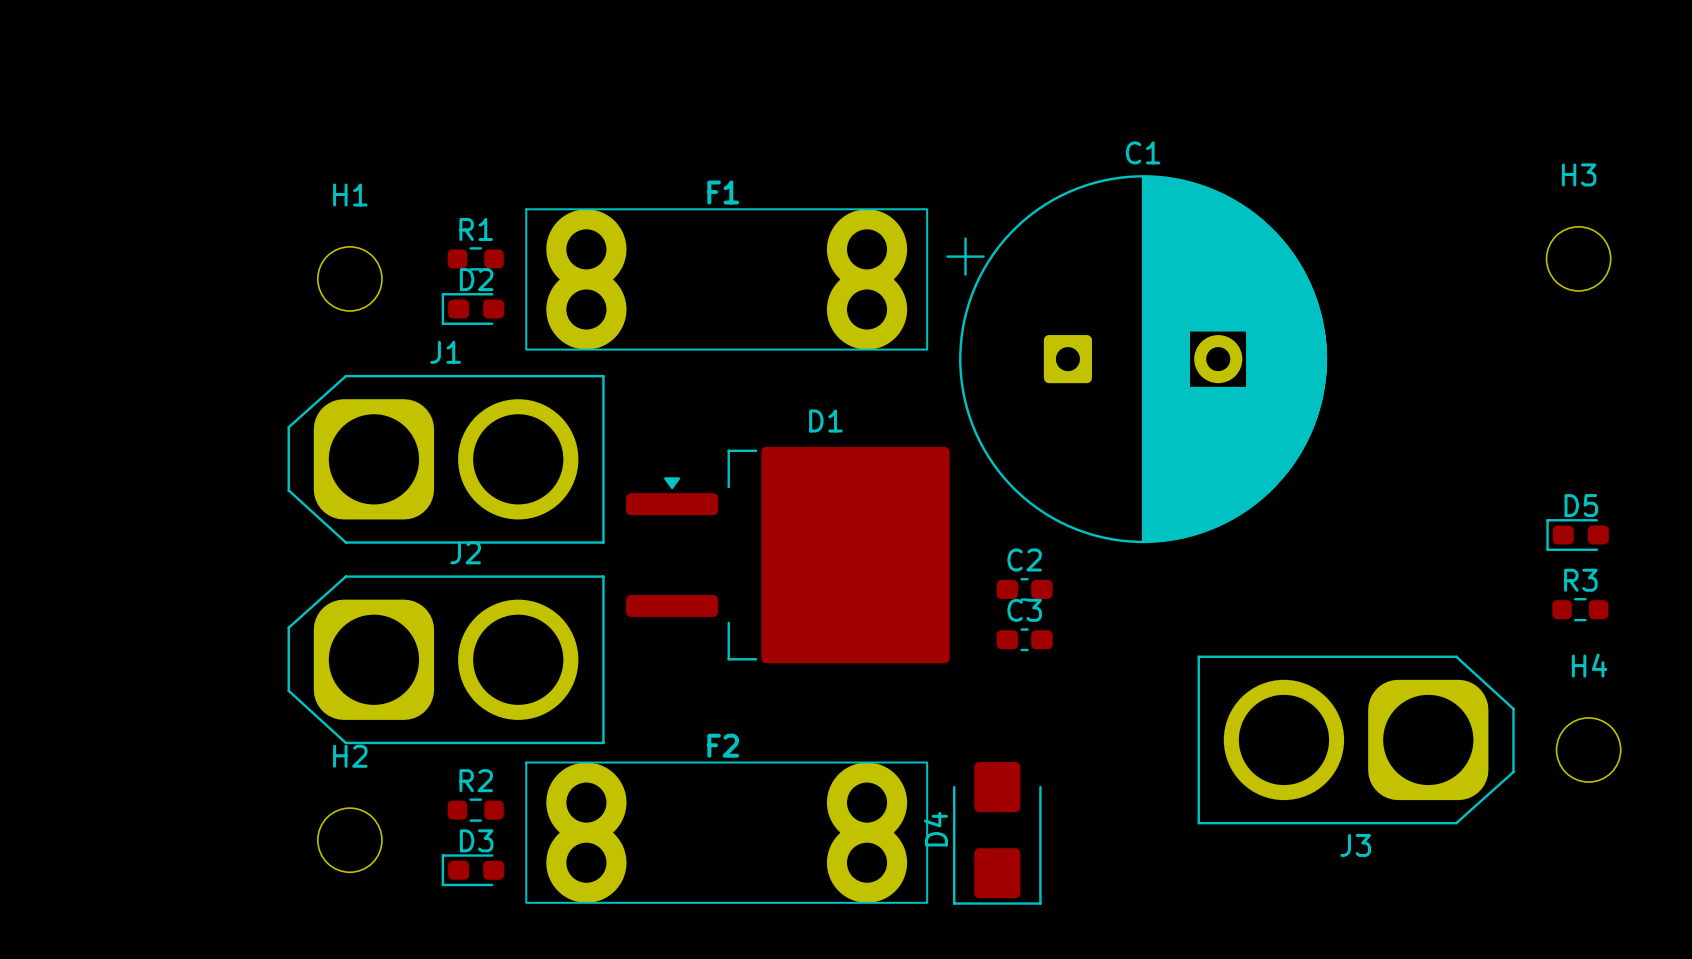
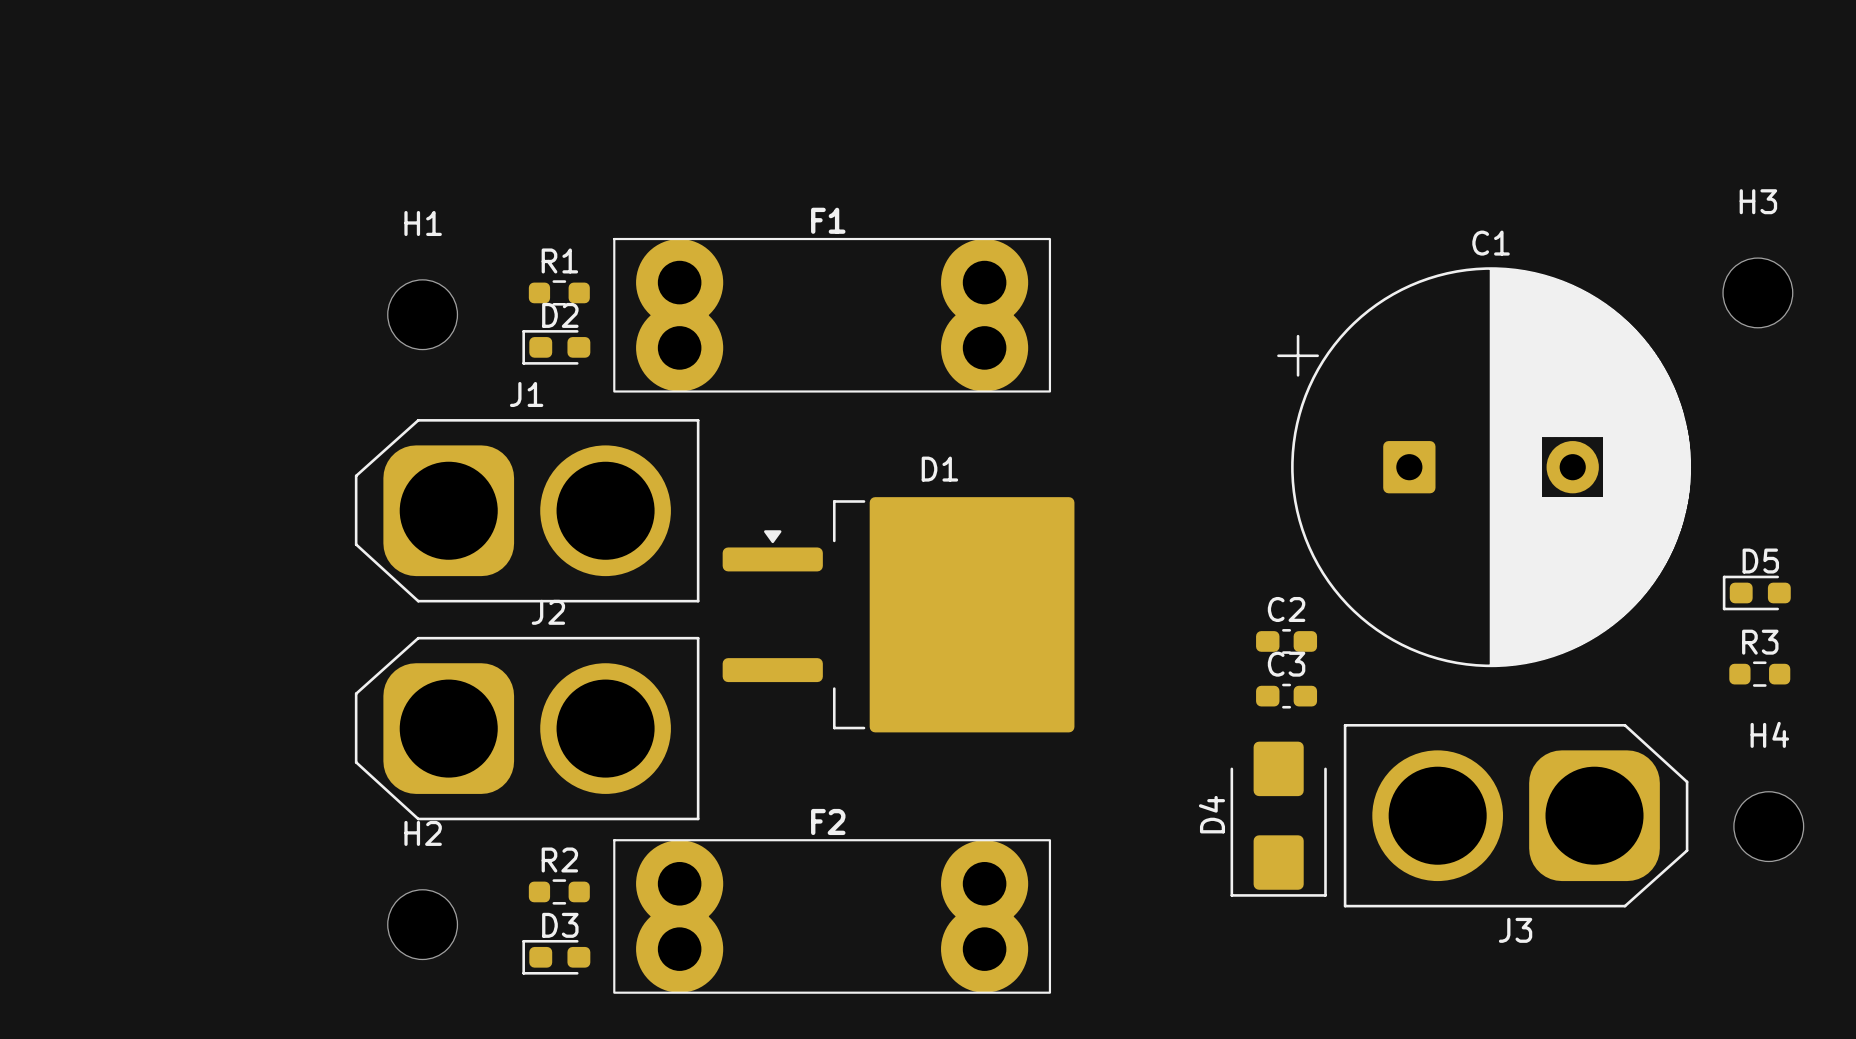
C1 position: (1136, 359) -> (1484, 467)
C2 position: (1024, 589) -> (1286, 641)
C3 position: (1024, 639) -> (1286, 696)
D4 position: (997, 833) -> (1278, 819)

